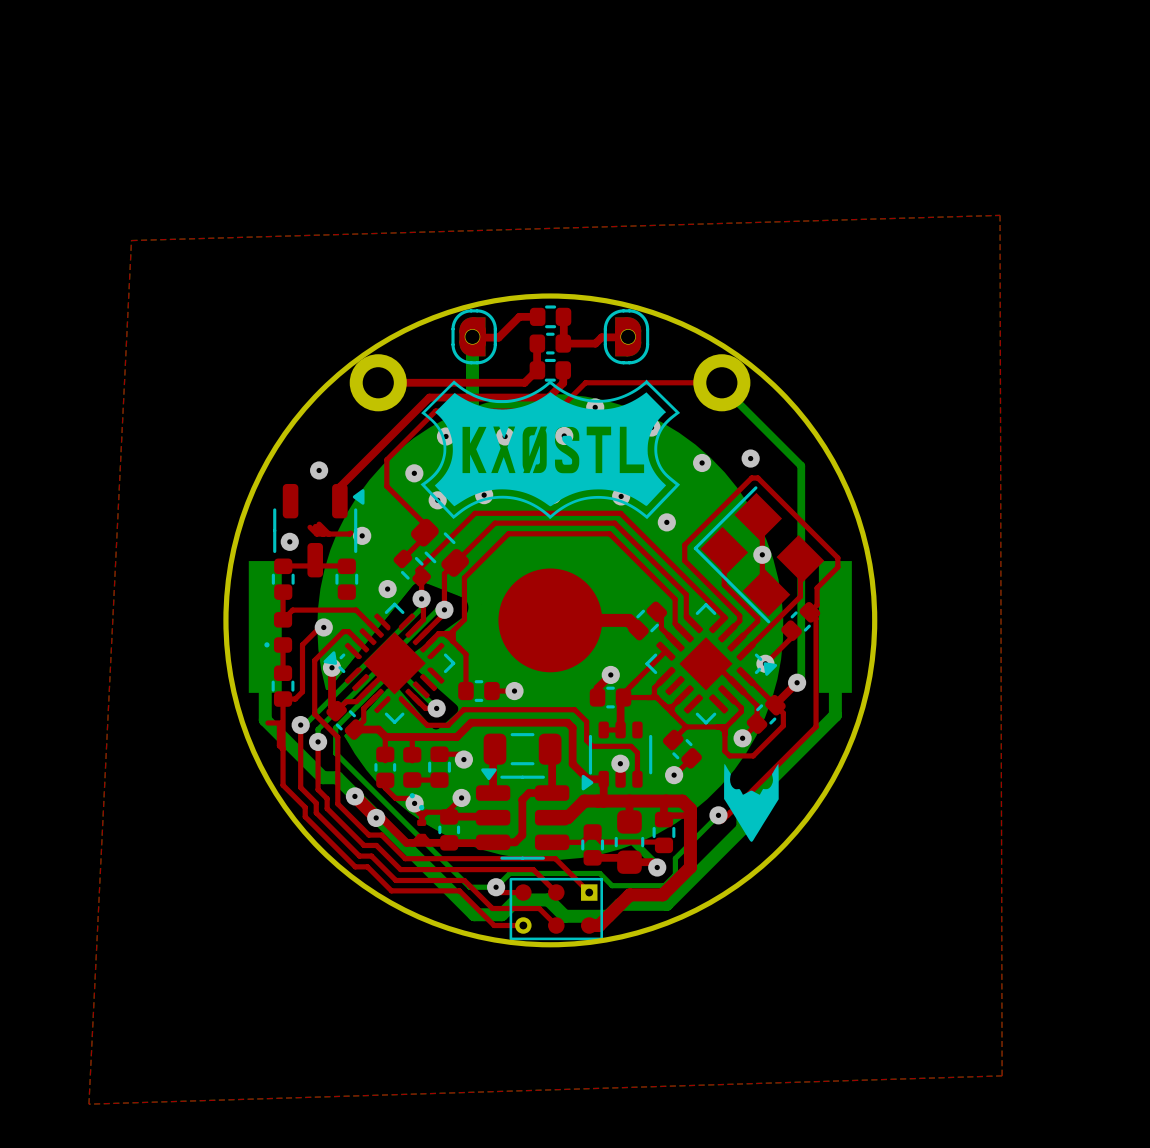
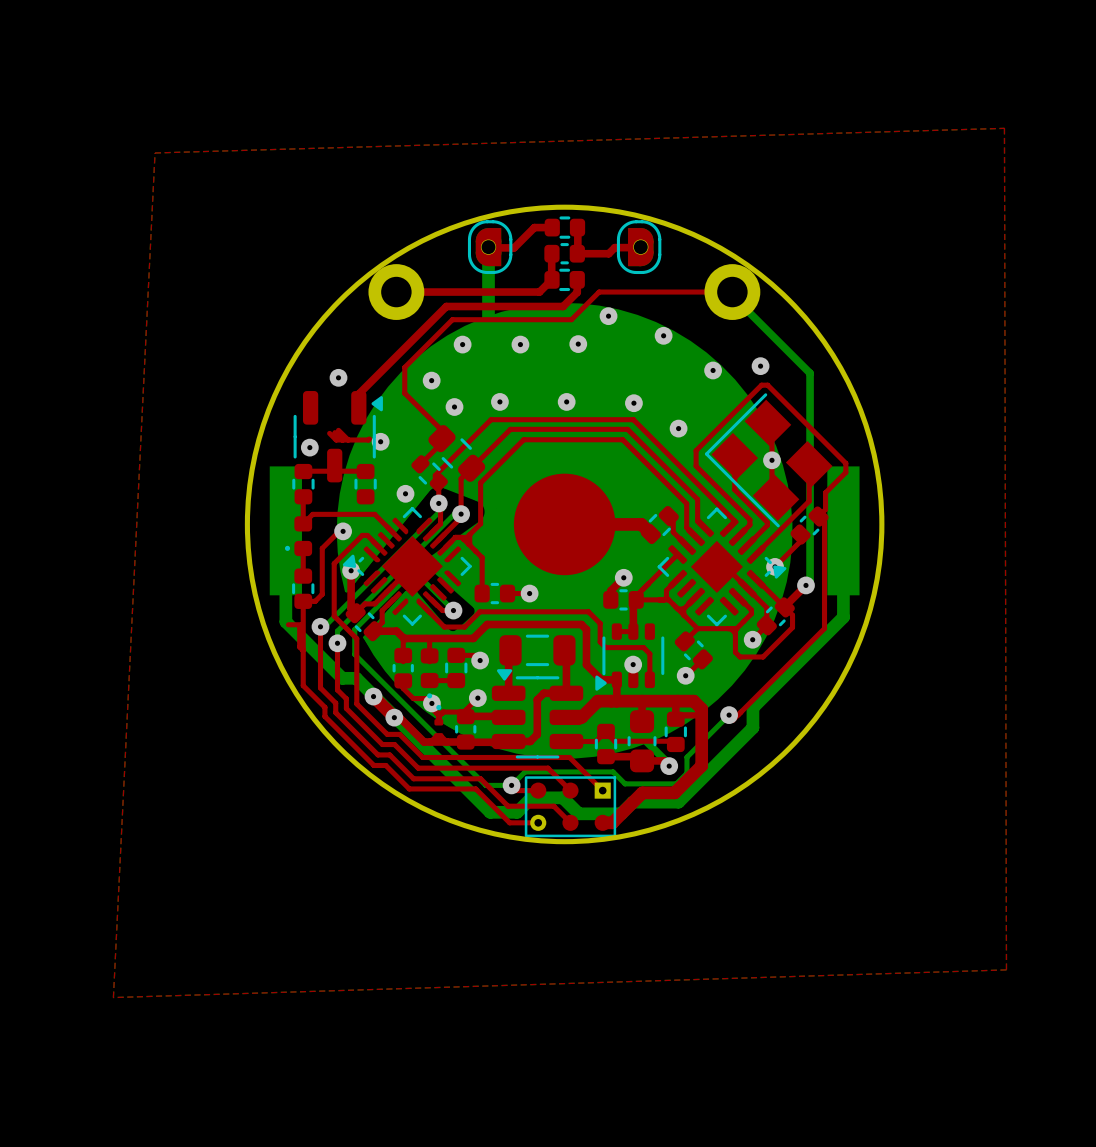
drawing: [420, 379, 681, 520] -> none
drawing: [724, 763, 779, 842] -> none

